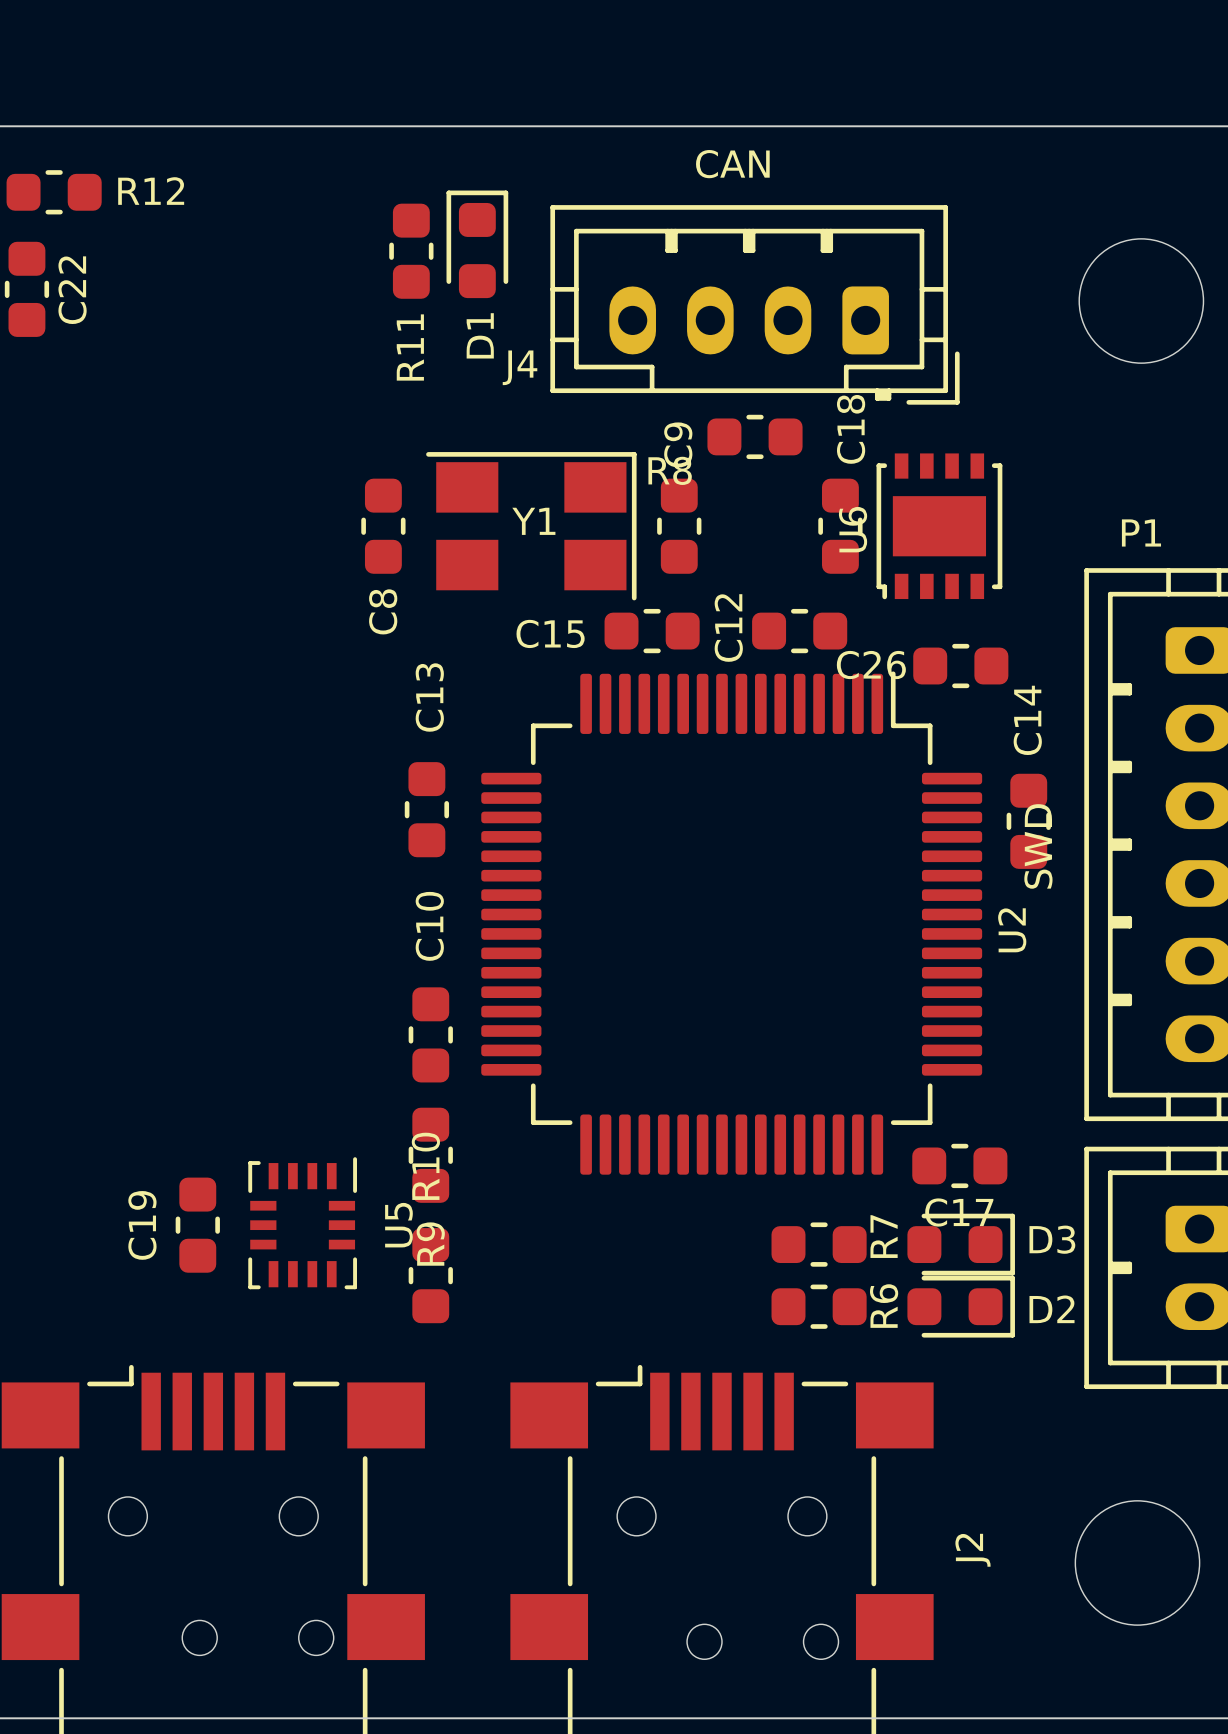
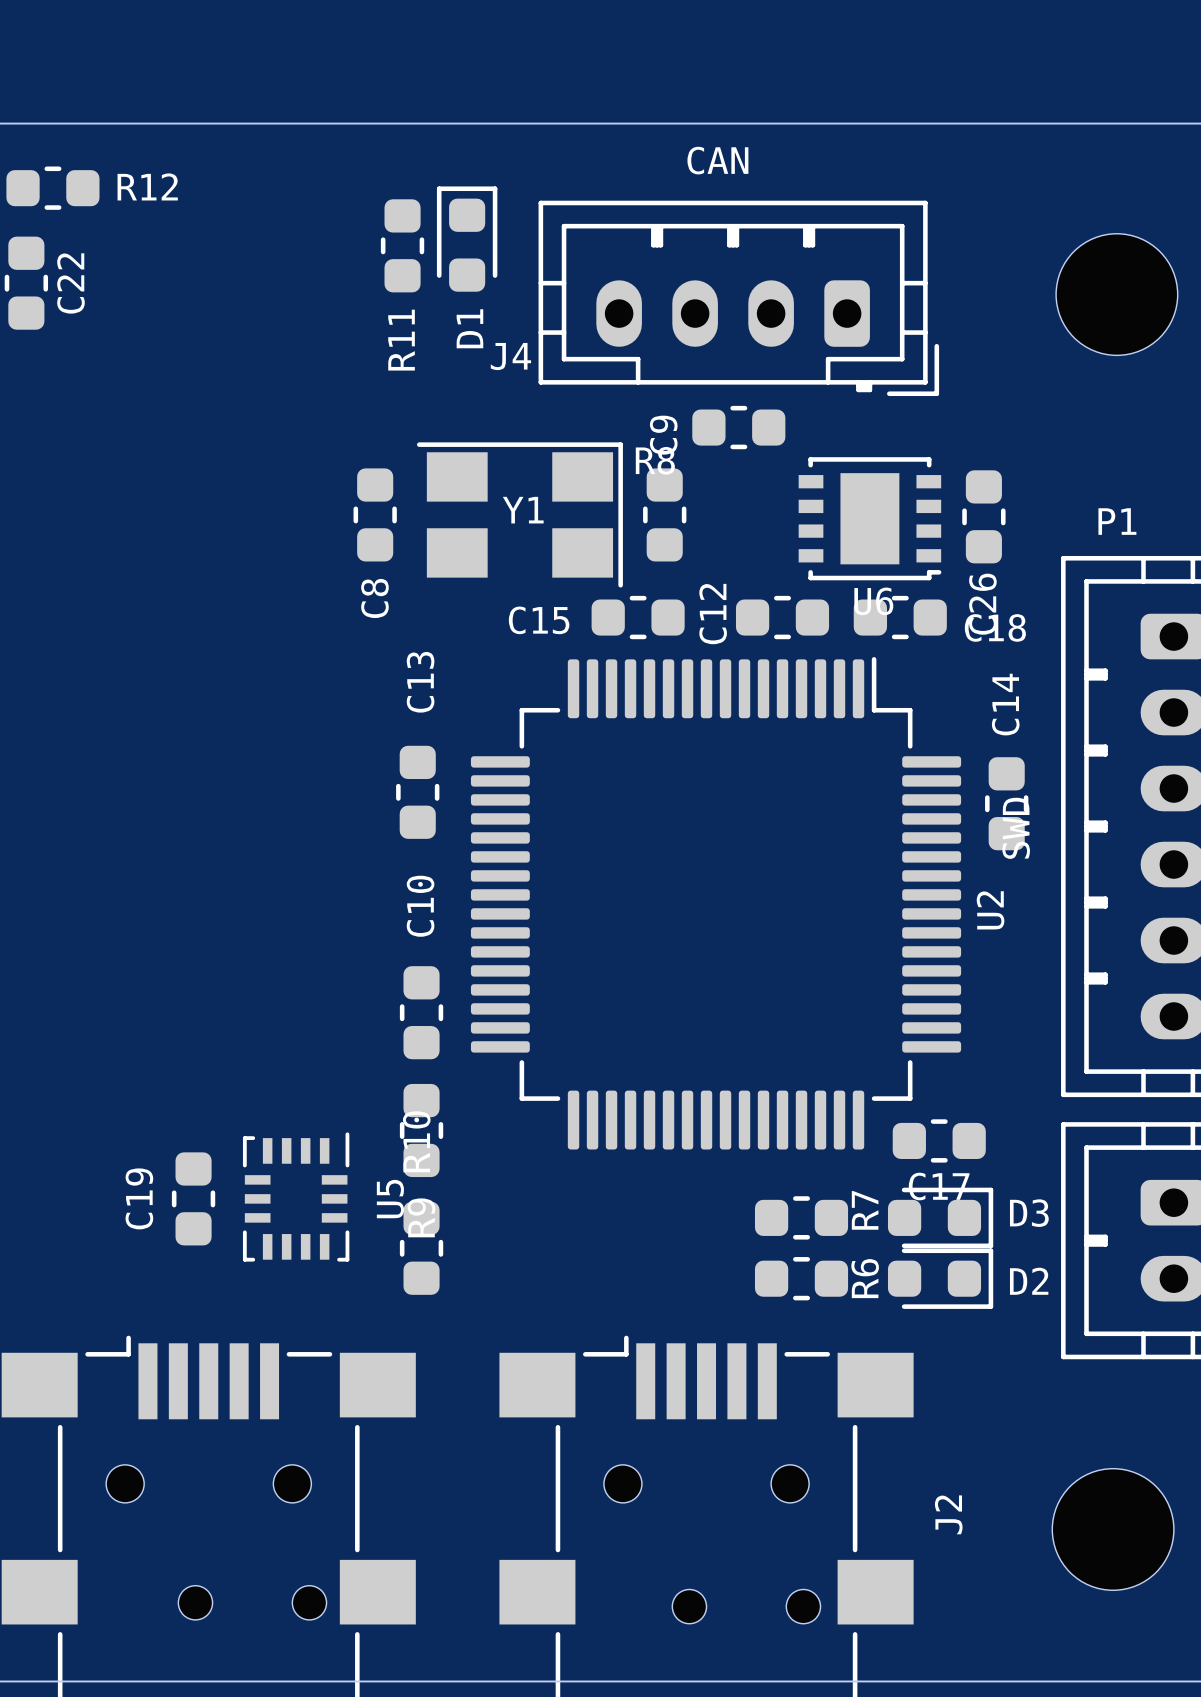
C18 rotation: 0° (840, 526) -> 90° clockwise (900, 617)
C18 position: (840, 526) -> (900, 617)
U6 rotation: 0° (939, 526) -> 90° counterclockwise (870, 518)
C26 name position: C26 (871, 665) -> C26 (982, 604)
C26 rotation: 0° (960, 666) -> 90° clockwise (983, 516)
C26 position: (960, 666) -> (983, 516)

